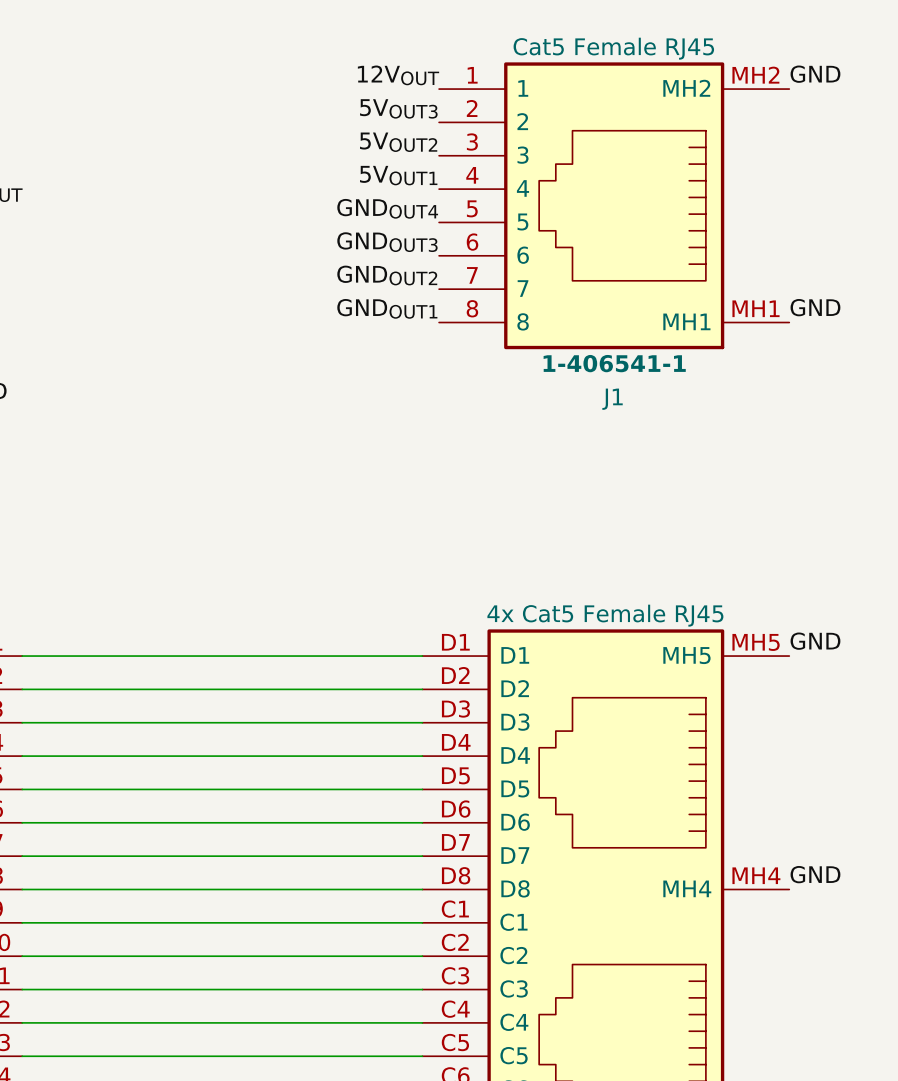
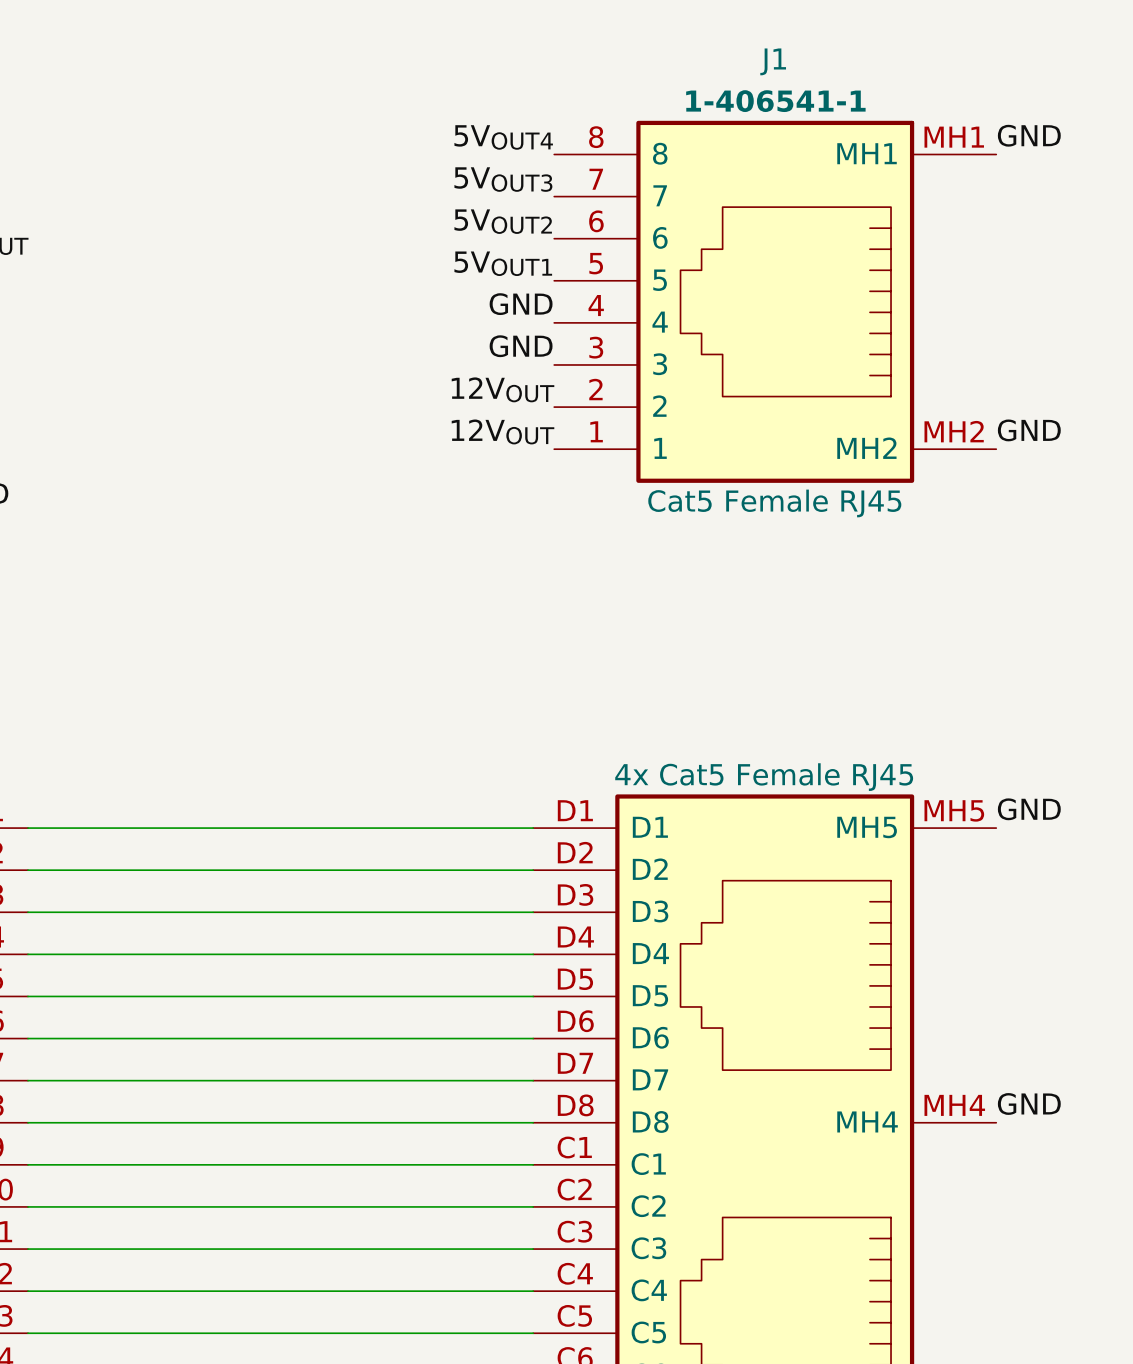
label position: GND (815, 74) -> GND (1029, 135)
label position: 12VOUT (398, 75) -> 12VOUT (503, 431)
label: 5VOUT3 (398, 108) -> 5VOUT4 (503, 137)
label: 5VOUT2 (398, 142) -> 5VOUT3 (503, 179)
label: 5VOUT1 (398, 175) -> 5VOUT2 (503, 221)
J1 flip: as is (614, 205) -> up-down (775, 301)
label: GNDOUT4 (387, 208) -> 5VOUT1 (503, 263)
label: GNDOUT3 (387, 242) -> GND (521, 304)
label: GNDOUT2 (387, 275) -> GND (521, 346)
label position: GND (815, 307) -> GND (1029, 430)
label: GNDOUT1 (387, 308) -> 12VOUT (503, 389)

